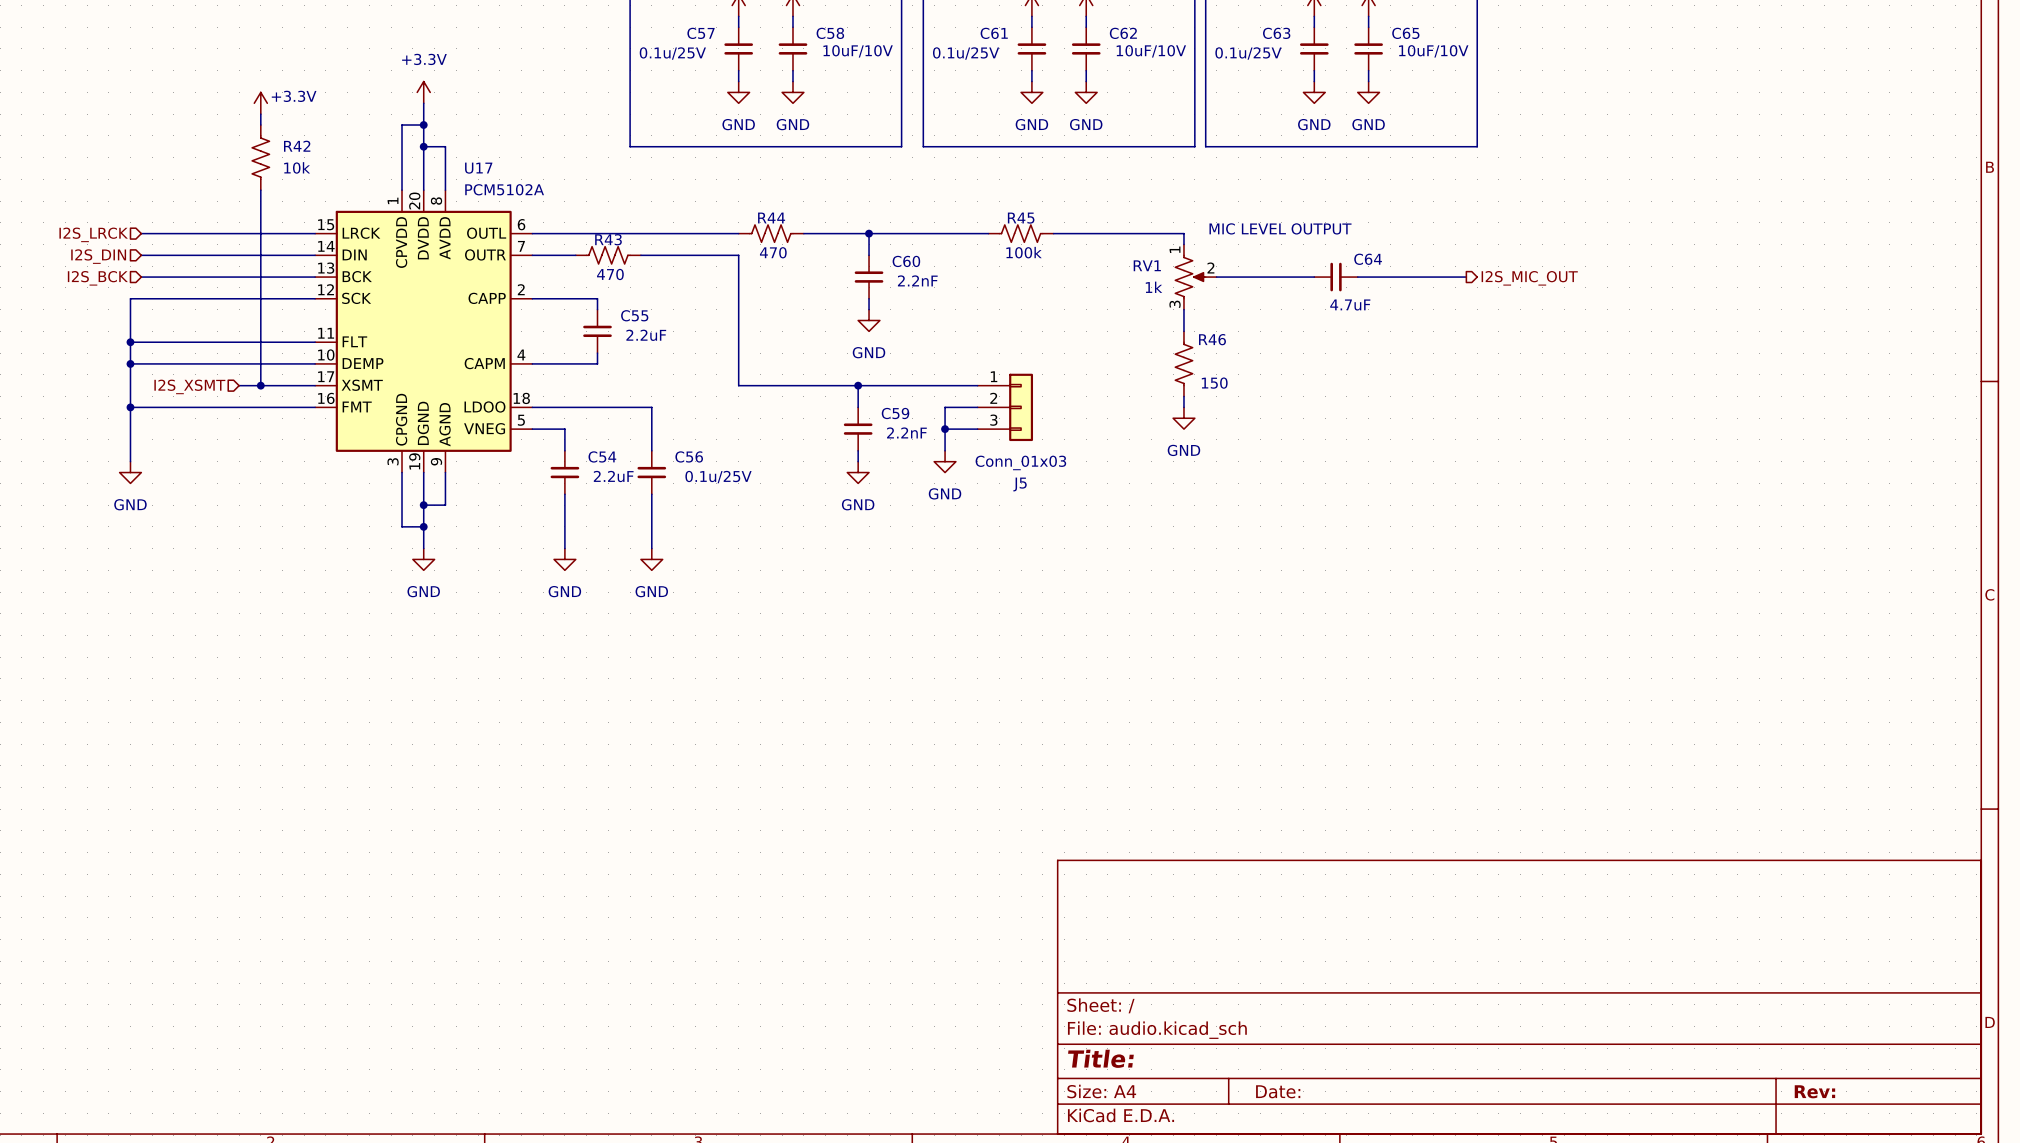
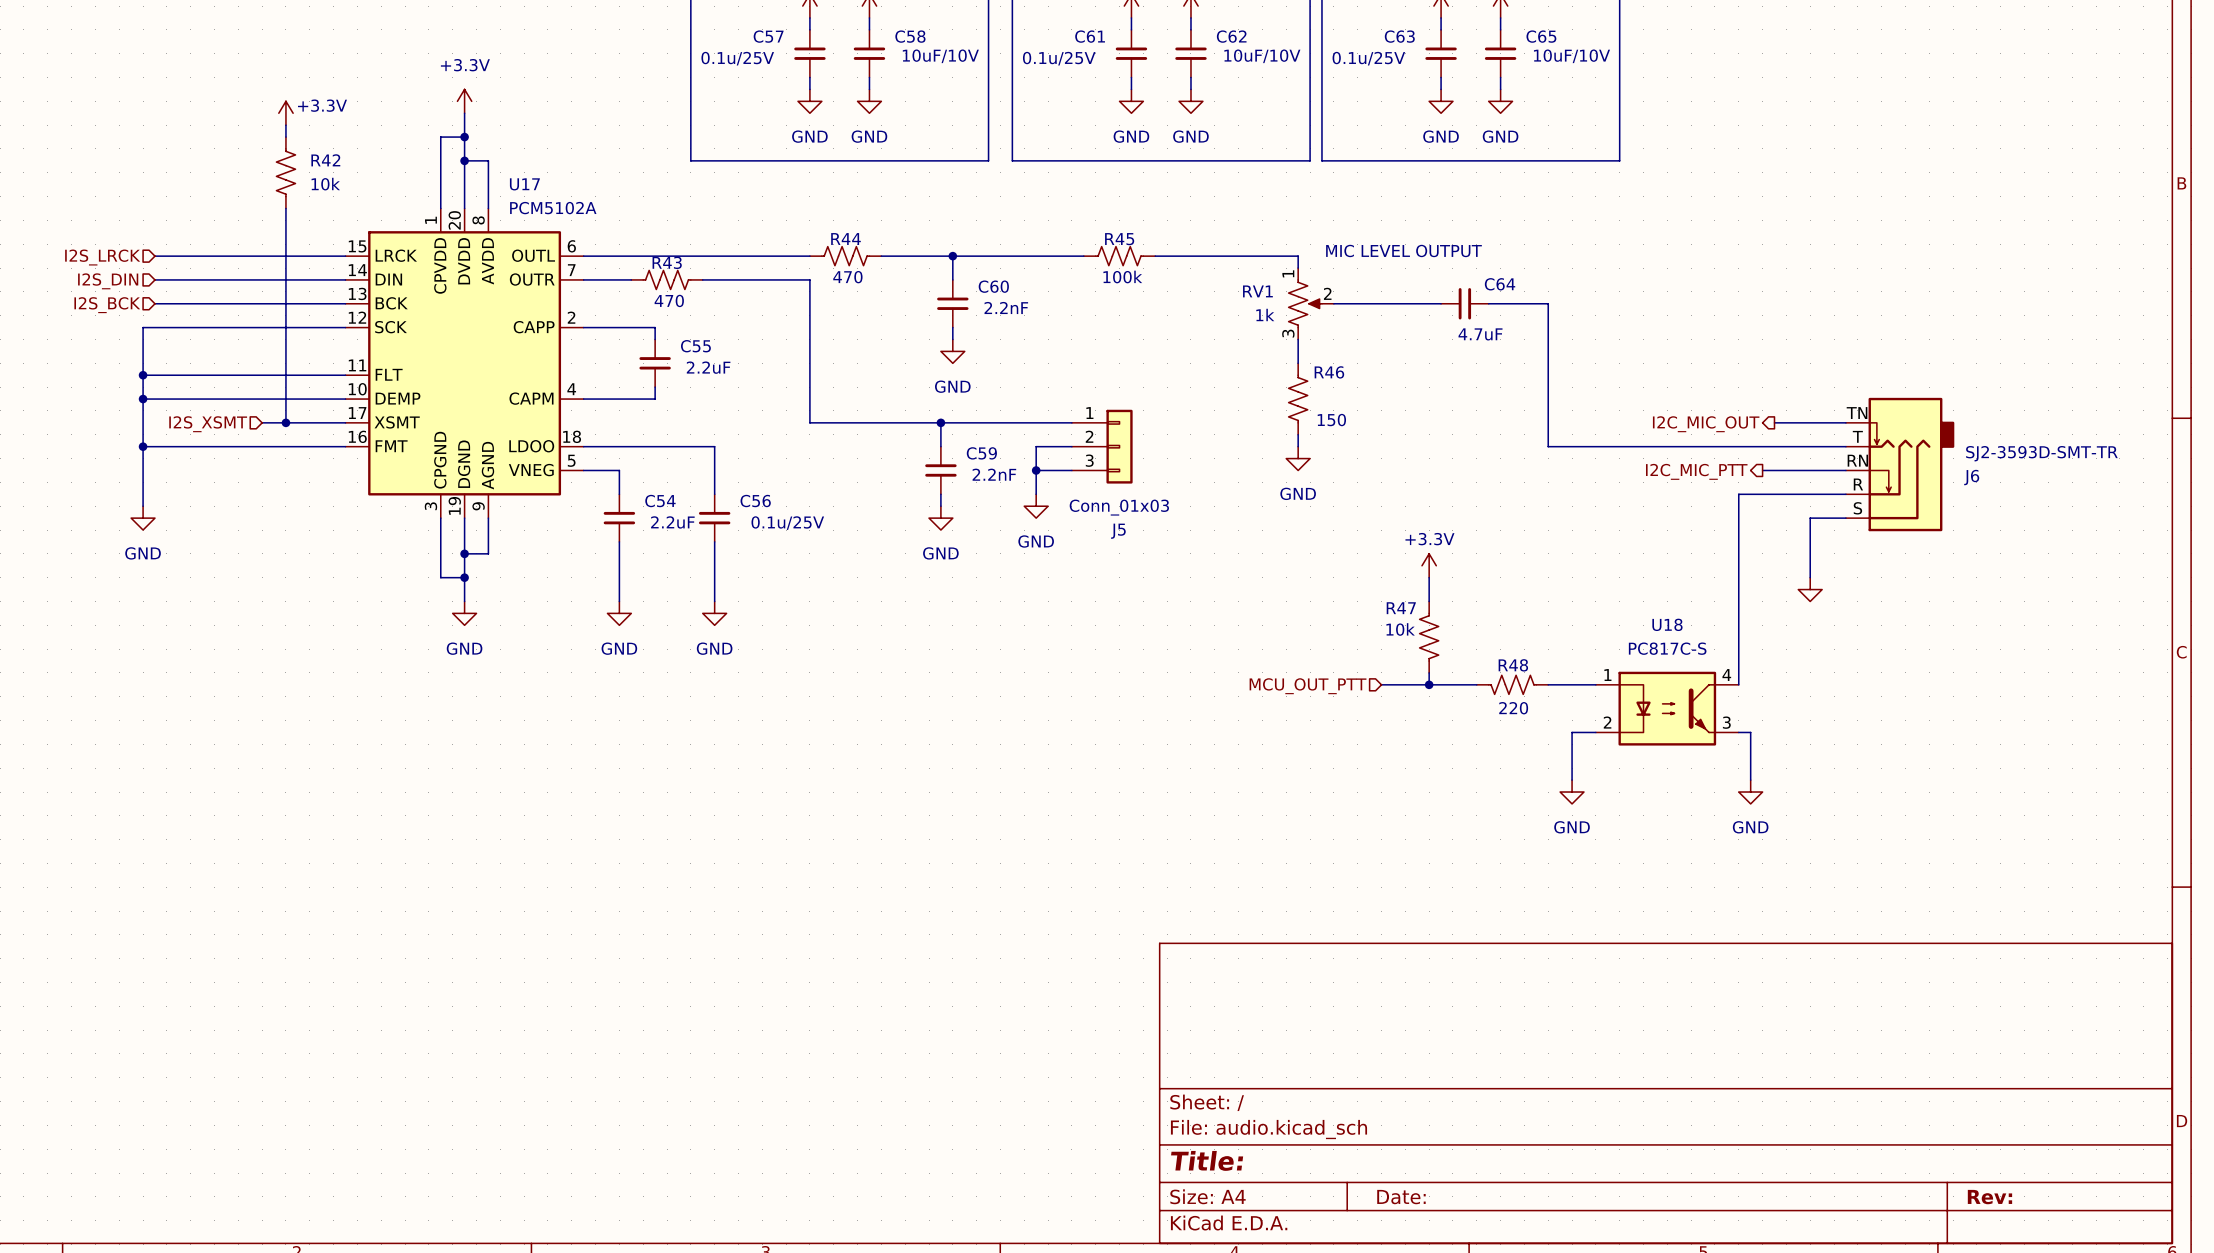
wire: (1412, 277) (1466, 277) -> (1548, 303) (1548, 446) (1845, 446)
hierarchical label: I2S_MIC_OUT (1529, 278) -> none
wire: none -> (1774, 422) (1845, 422)
hierarchical label: none -> I2C_MIC_OUT (1706, 424)
J6: none -> SJ2-3593D-SMT-TR (1900, 464)
wire: none -> (1762, 470) (1845, 470)
hierarchical label: none -> I2C_MIC_PTT (1696, 471)
wire: none -> (1845, 494) (1738, 494) (1738, 684)
wire: none -> (1845, 518) (1810, 518) (1810, 577)
power symbol: none -> +3.3V (1429, 565)
wire: none -> (1429, 577) (1429, 601)
power symbol: none -> (1810, 589)
R47: none -> 10k (1429, 637)
wire: none -> (1429, 672) (1429, 684)
wire: none -> (1381, 684) (1476, 684)
junction: none -> (1429, 684)
R48: none -> 220 (1512, 684)
wire: none -> (1548, 684) (1595, 684)
hierarchical label: none -> MCU_OUT_PTT (1308, 686)
U18: none -> PC817C-S (1667, 708)
wire: none -> (1595, 732) (1572, 732) (1572, 780)
wire: none -> (1738, 732) (1750, 732) (1750, 780)
power symbol: none -> GND (1572, 792)
power symbol: none -> GND (1750, 792)

